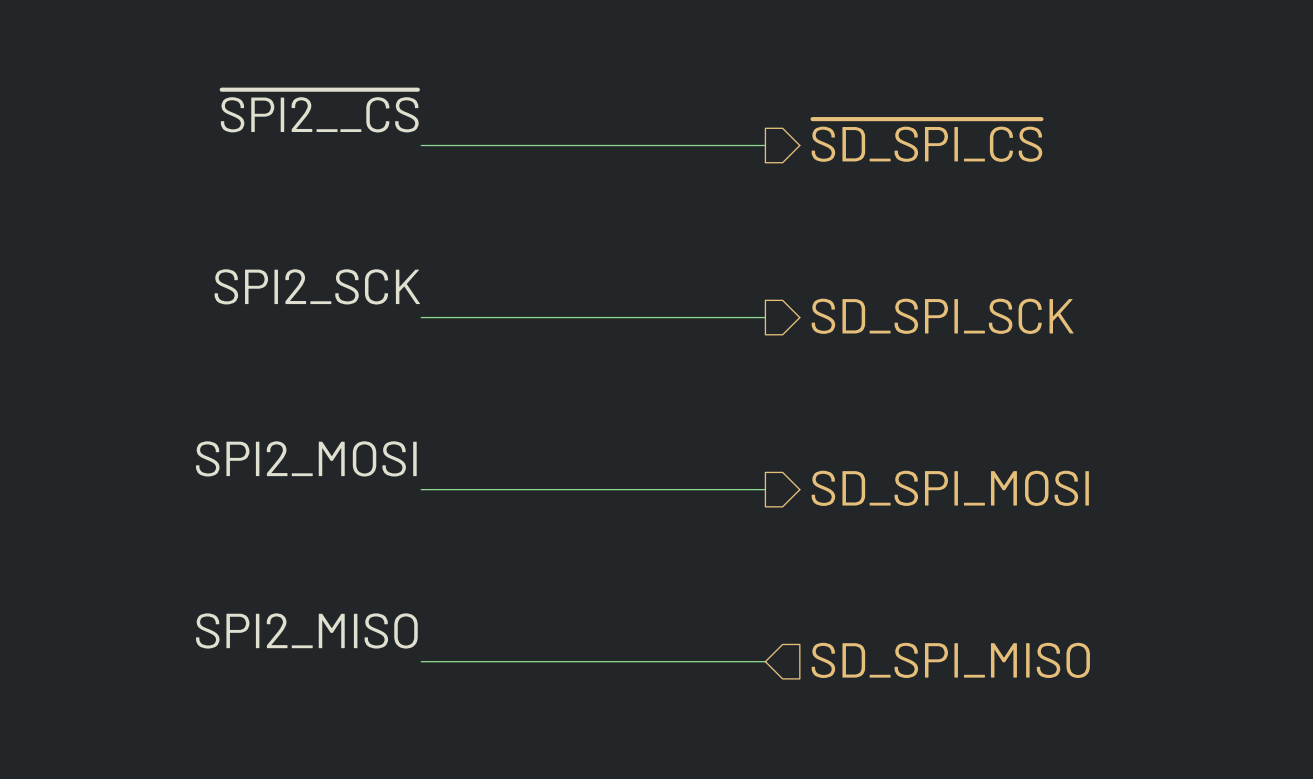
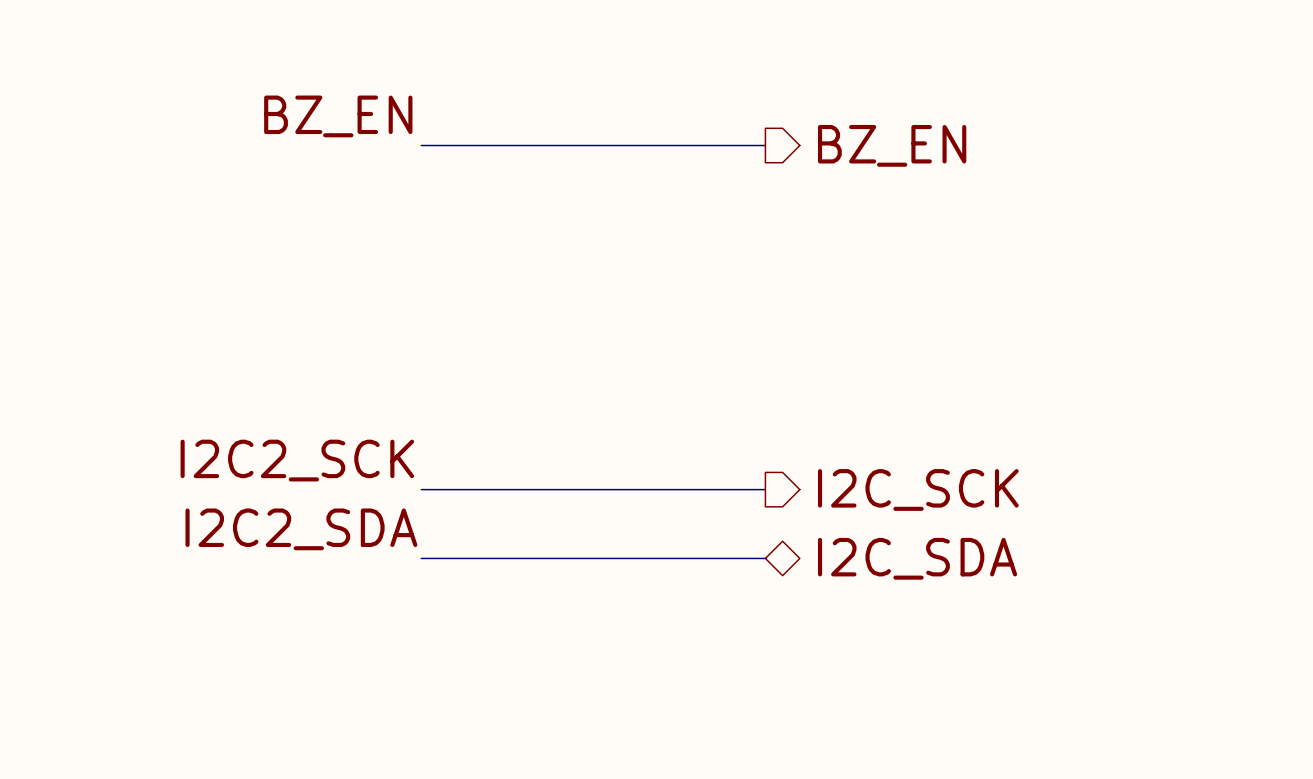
label: ~{SPI2__CS} (319, 111) -> BZ_EN (338, 116)
hierarchical label: ~{SD_SPI_CS} (926, 140) -> BZ_EN (892, 145)
label: SPI2_SCK (317, 286) -> none
hierarchical label: SD_SPI_SCK (942, 316) -> none
wire: (421, 317) (765, 317) -> none
label: SPI2_MOSI (306, 458) -> I2C2_SCK (297, 460)
hierarchical label: SD_SPI_MOSI (950, 488) -> I2C_SCK (918, 489)
label: none -> I2C2_SDA (301, 529)
hierarchical label: none -> I2C_SDA (917, 558)
label: SPI2_MISO (306, 630) -> none
hierarchical label: SD_SPI_MISO (950, 660) -> none
wire: (421, 661) (765, 661) -> (421, 558) (765, 558)

